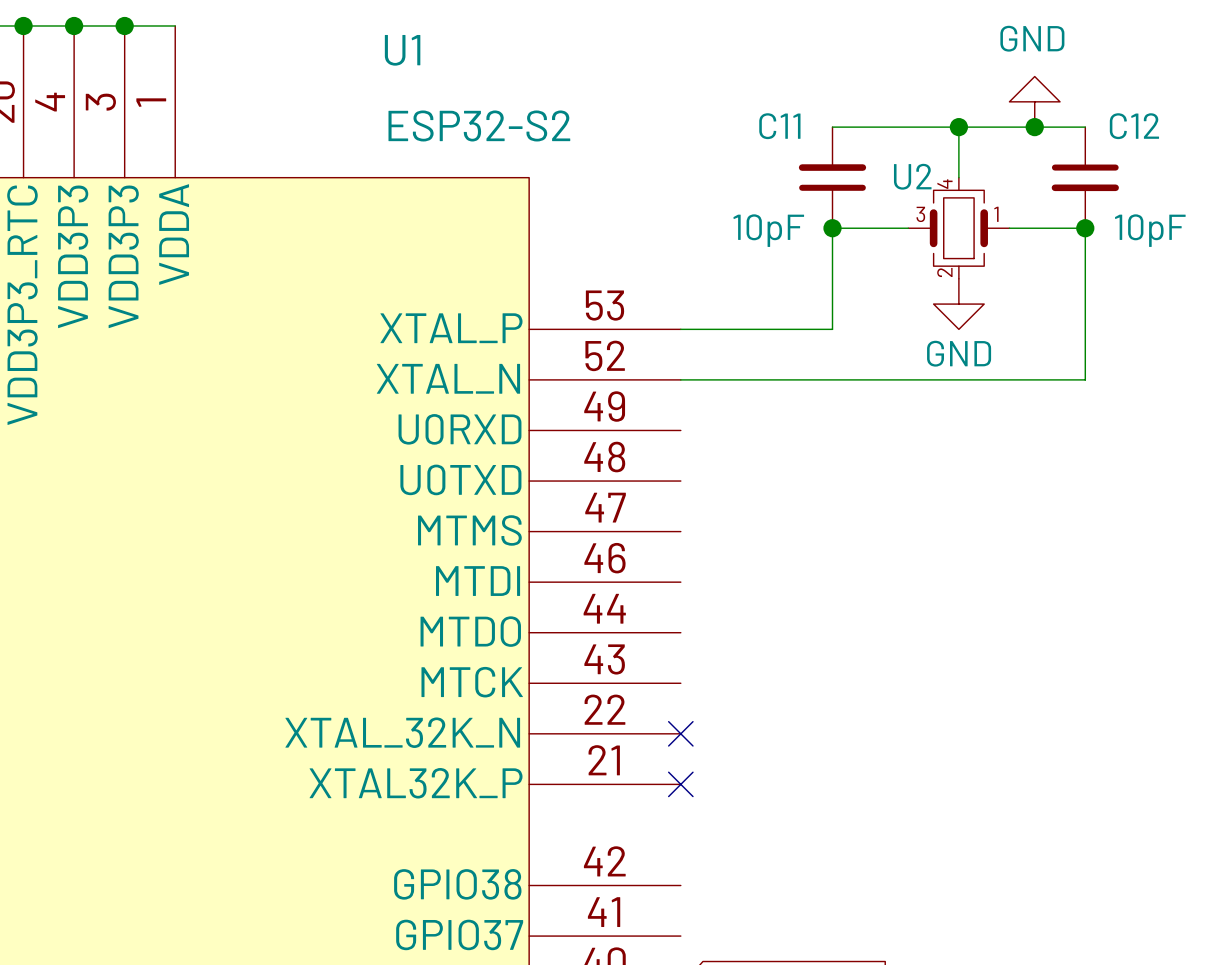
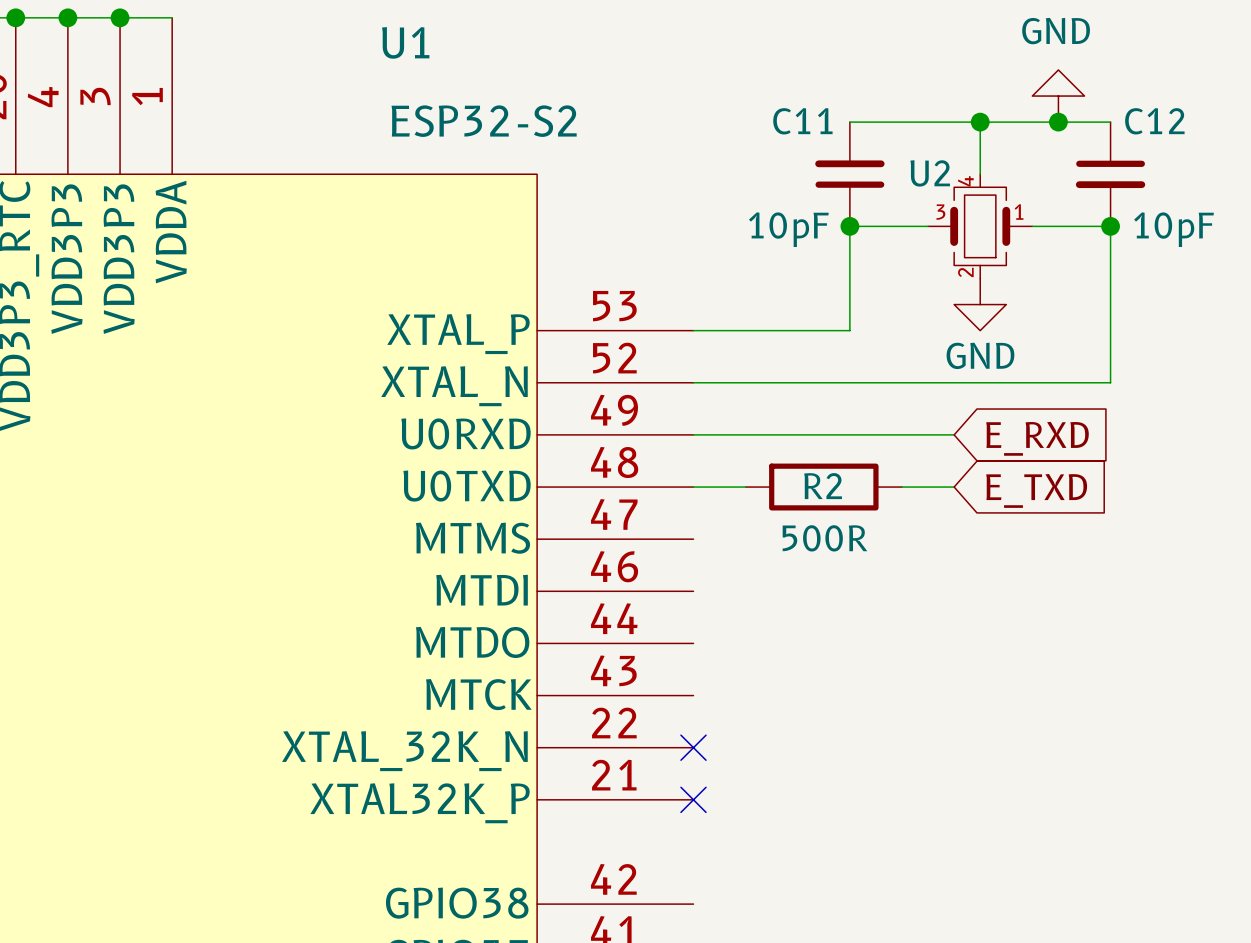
wire: none -> (693, 434) (954, 434)
global label: none -> E_RXD (1037, 438)
wire: none -> (693, 487) (745, 487)
R2: none -> 500R (823, 487)
wire: none -> (902, 487) (954, 487)
global label: none -> E_TXD (1036, 490)

